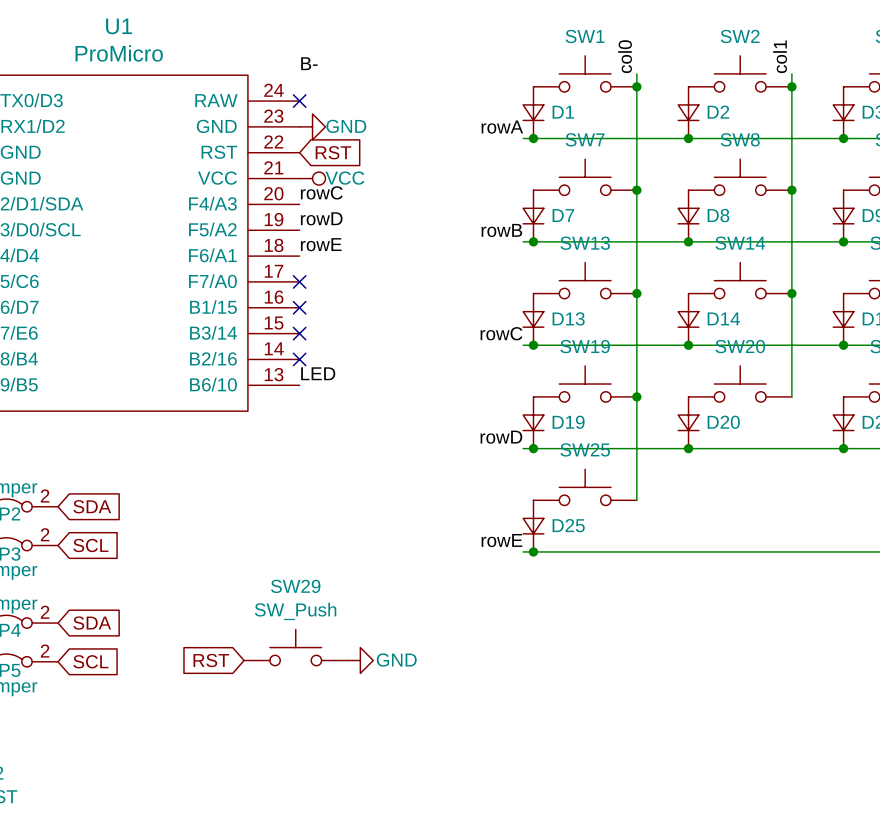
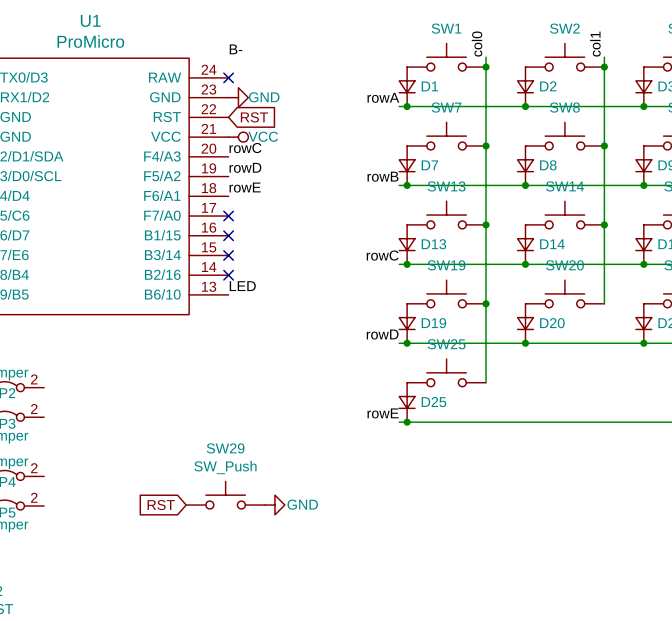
global label: SDA (92, 506) -> none
global label: SCL (90, 545) -> none
global label: SDA (92, 623) -> none
global label: SCL (90, 661) -> none

